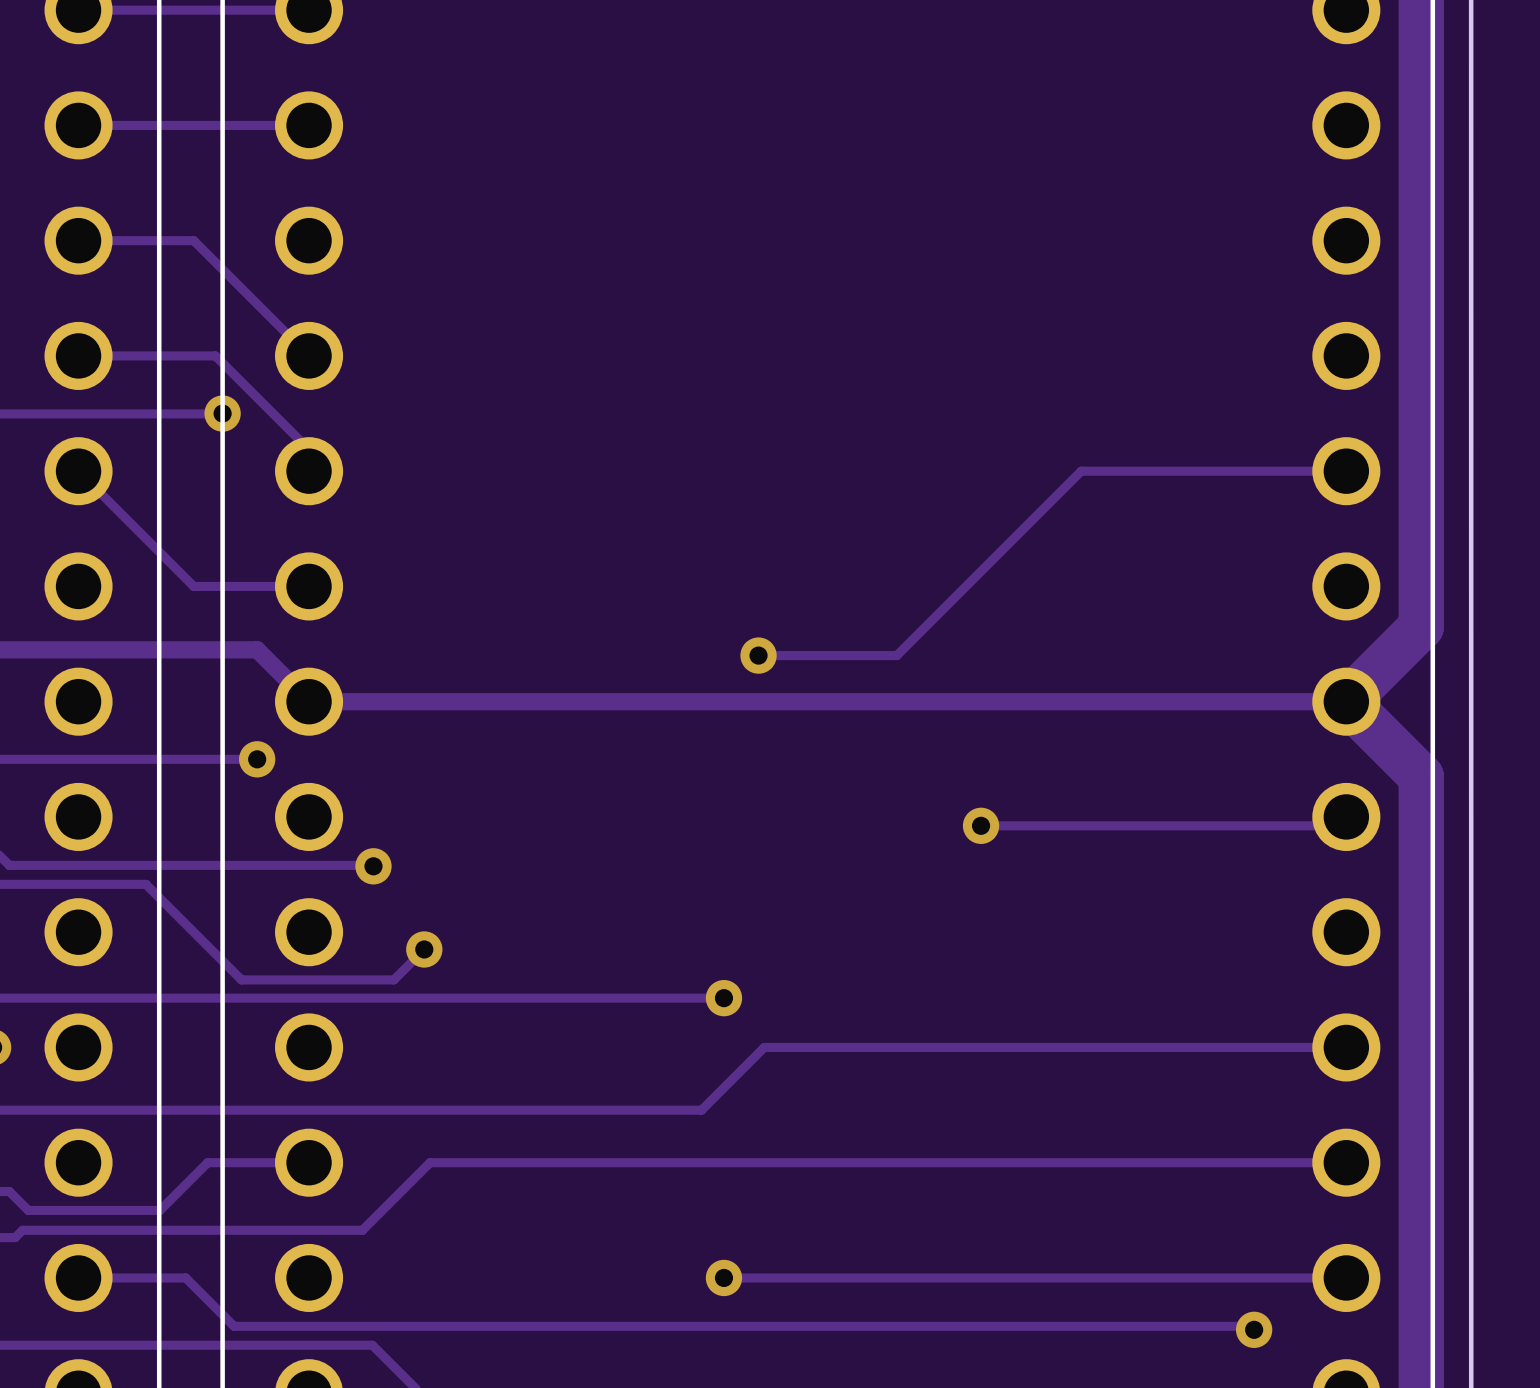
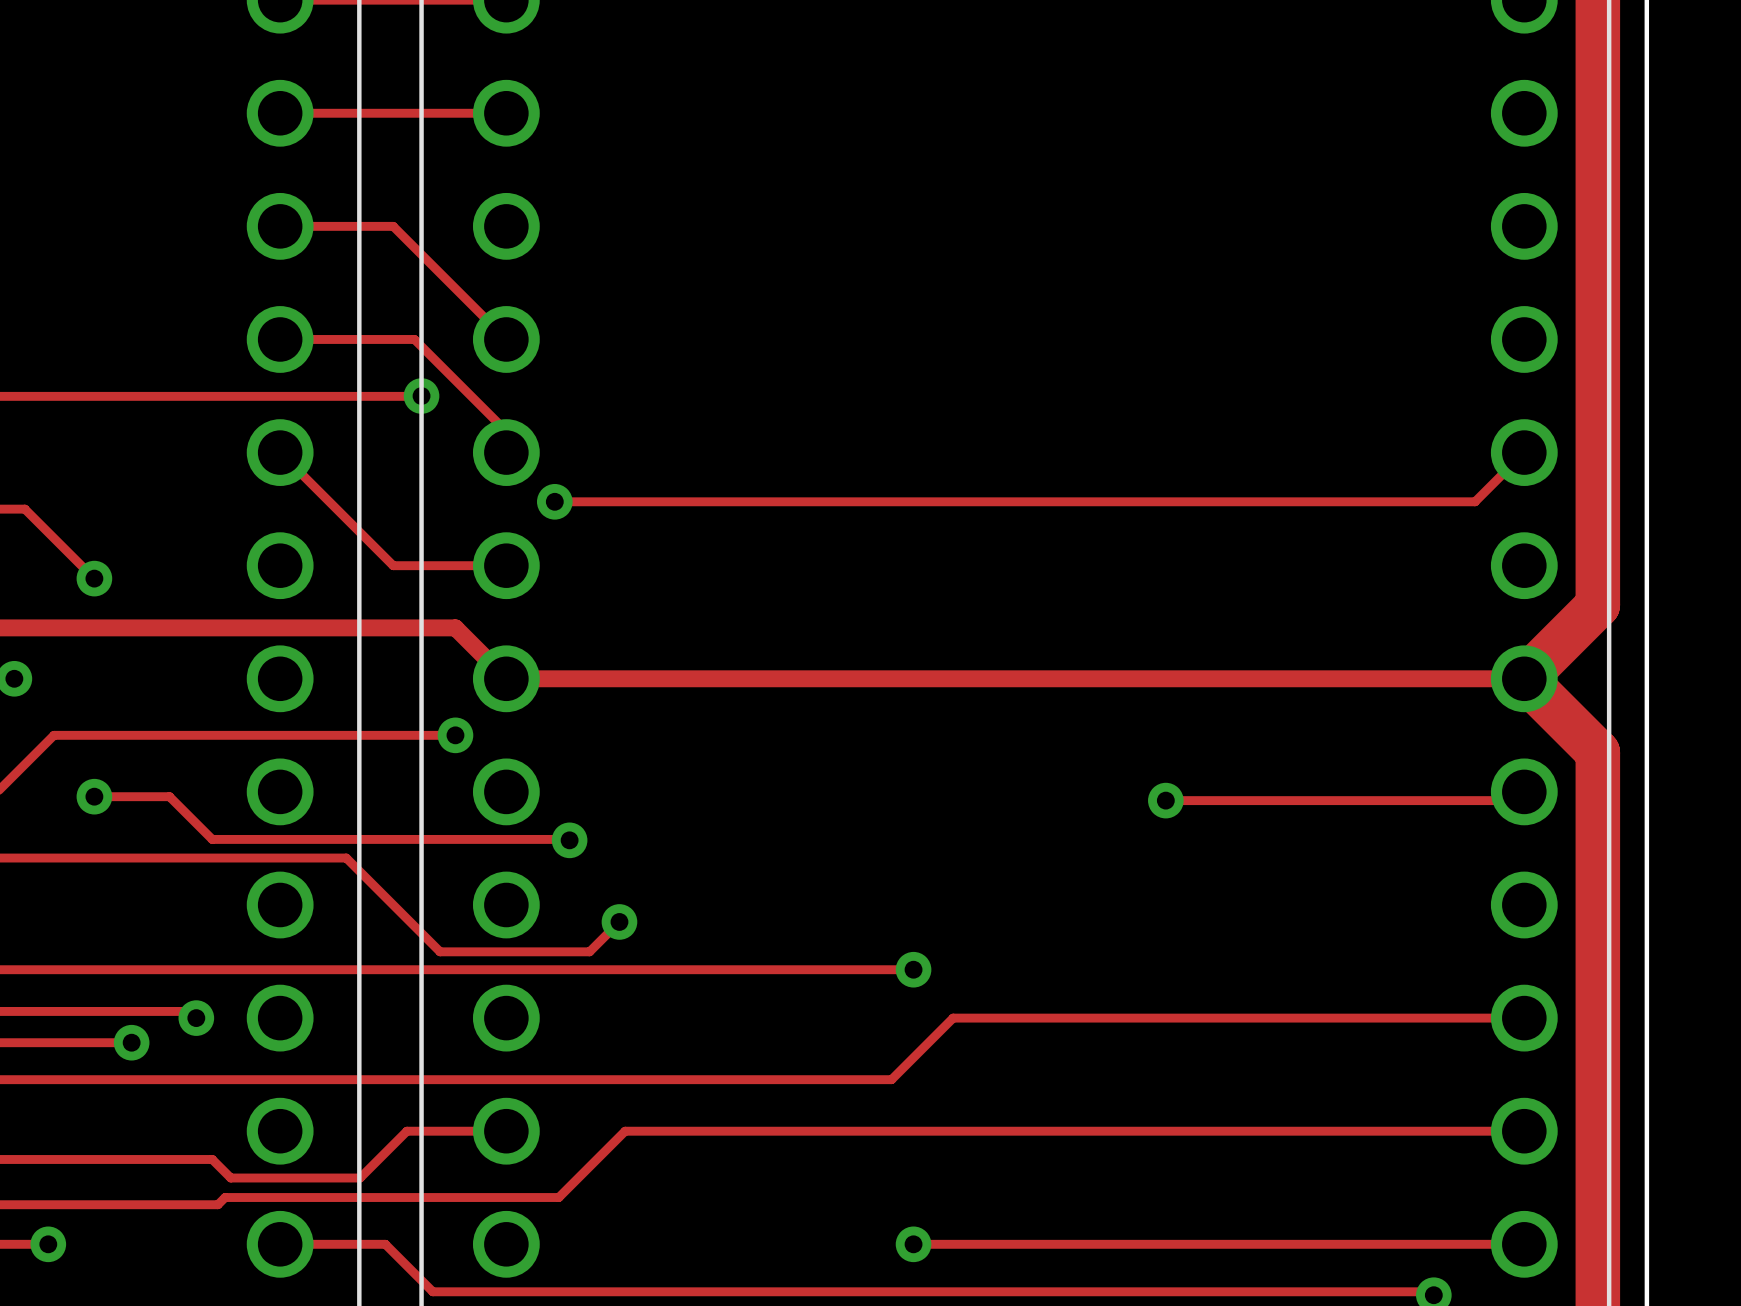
track: (1346, 471) (1081, 471) (896, 655) (758, 655) -> (1524, 452) (1475, 501) (554, 501)
via: none -> (554, 501)
via: (758, 655) -> none

